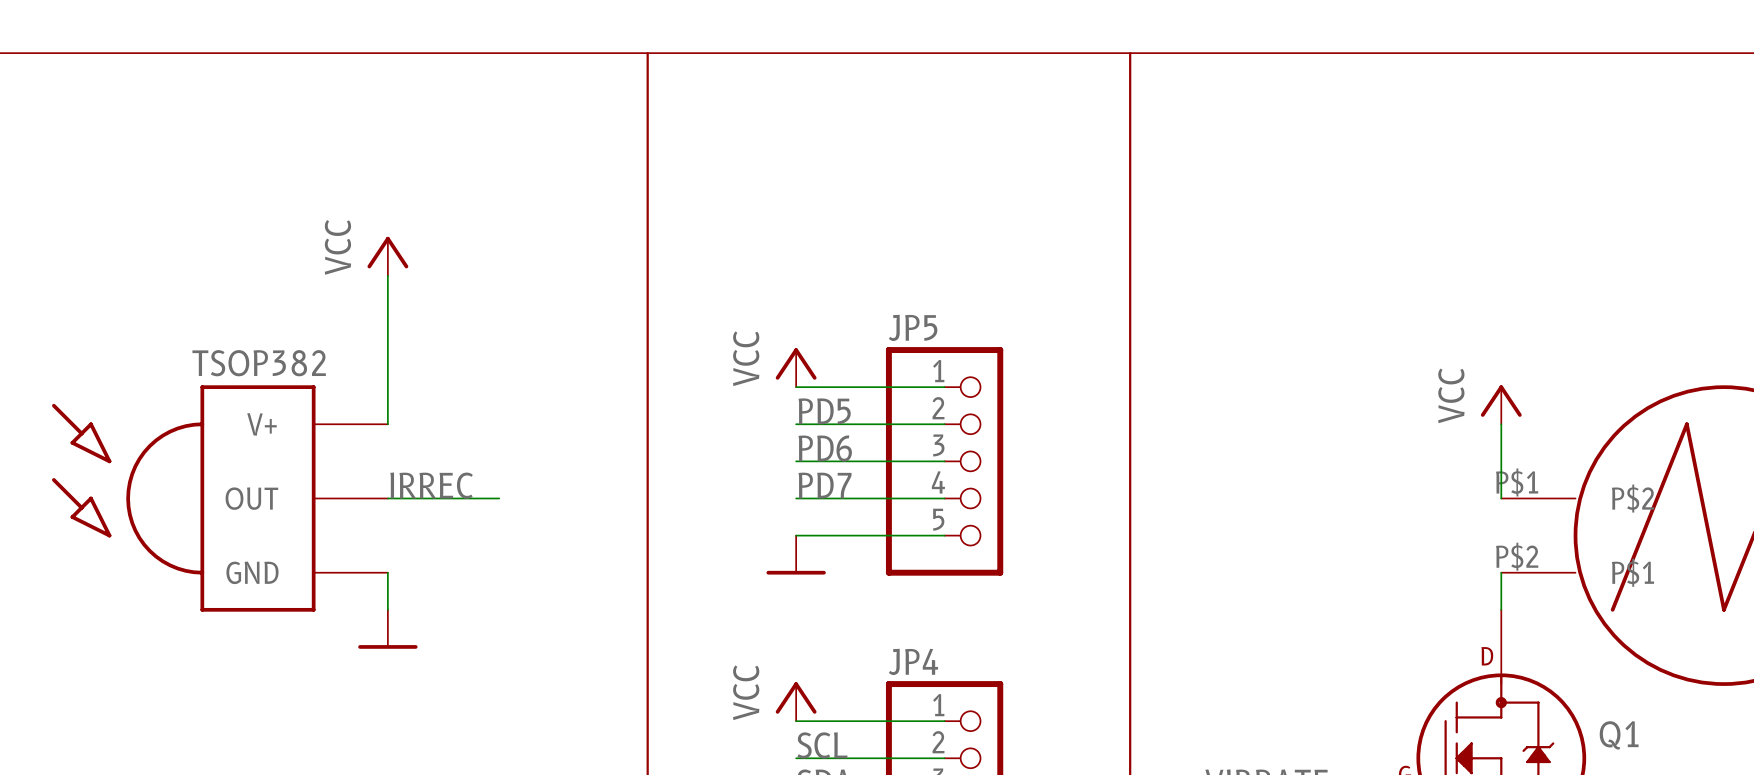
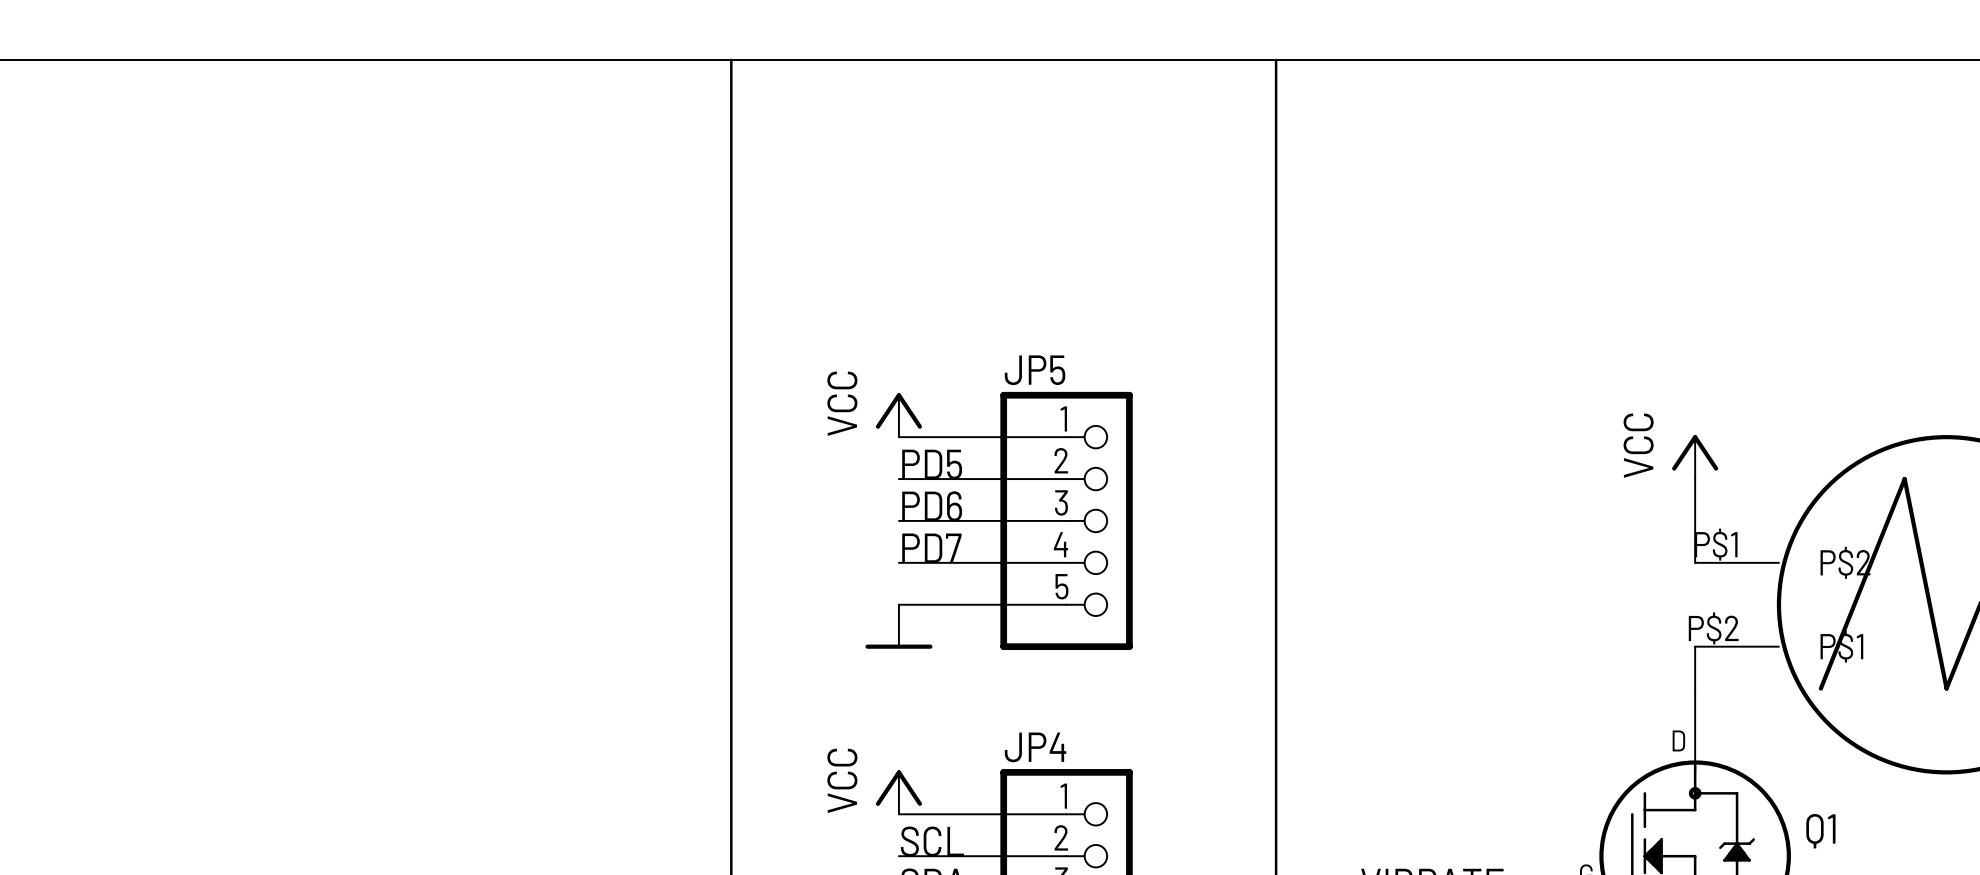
power symbol: VCC (387, 256) -> none
wire: (387, 275) (387, 424) -> none
label: IRREC (431, 485) -> none
part: TSOP382 (219, 498) -> none
wire: (387, 498) (499, 498) -> none
wire: (387, 572) (387, 609) -> none
power symbol: (387, 629) -> none

